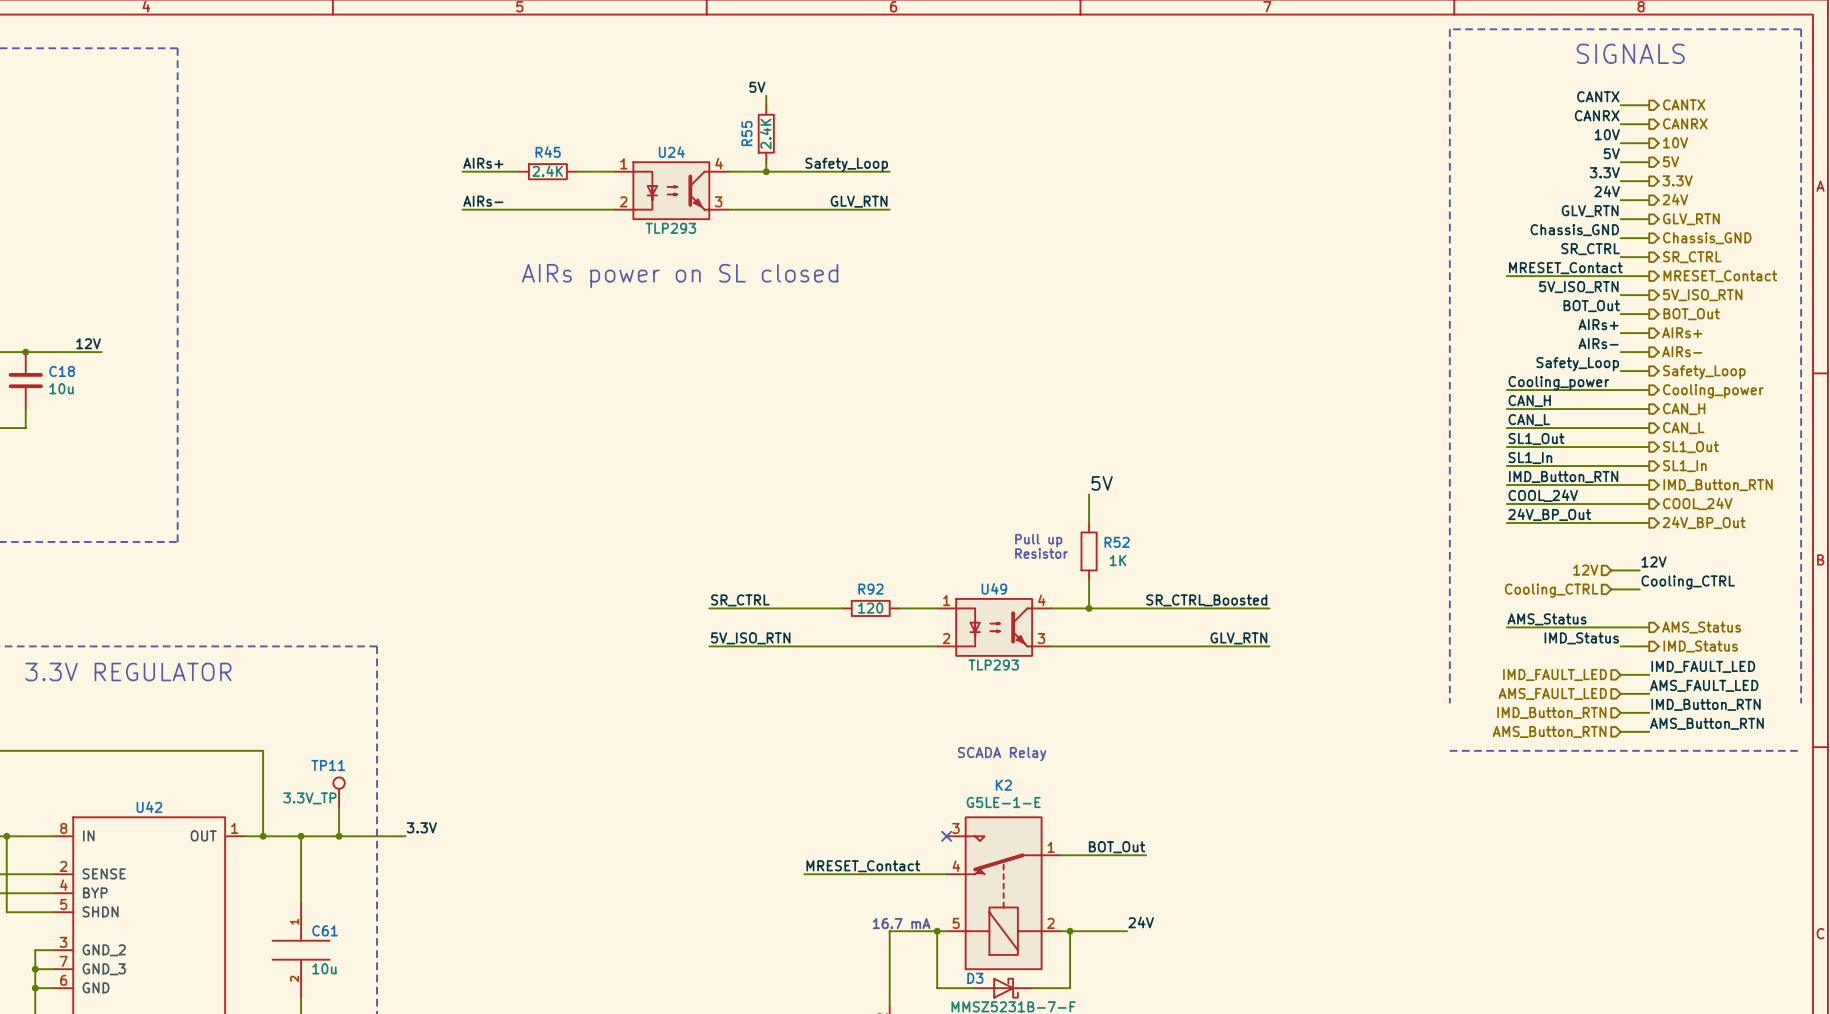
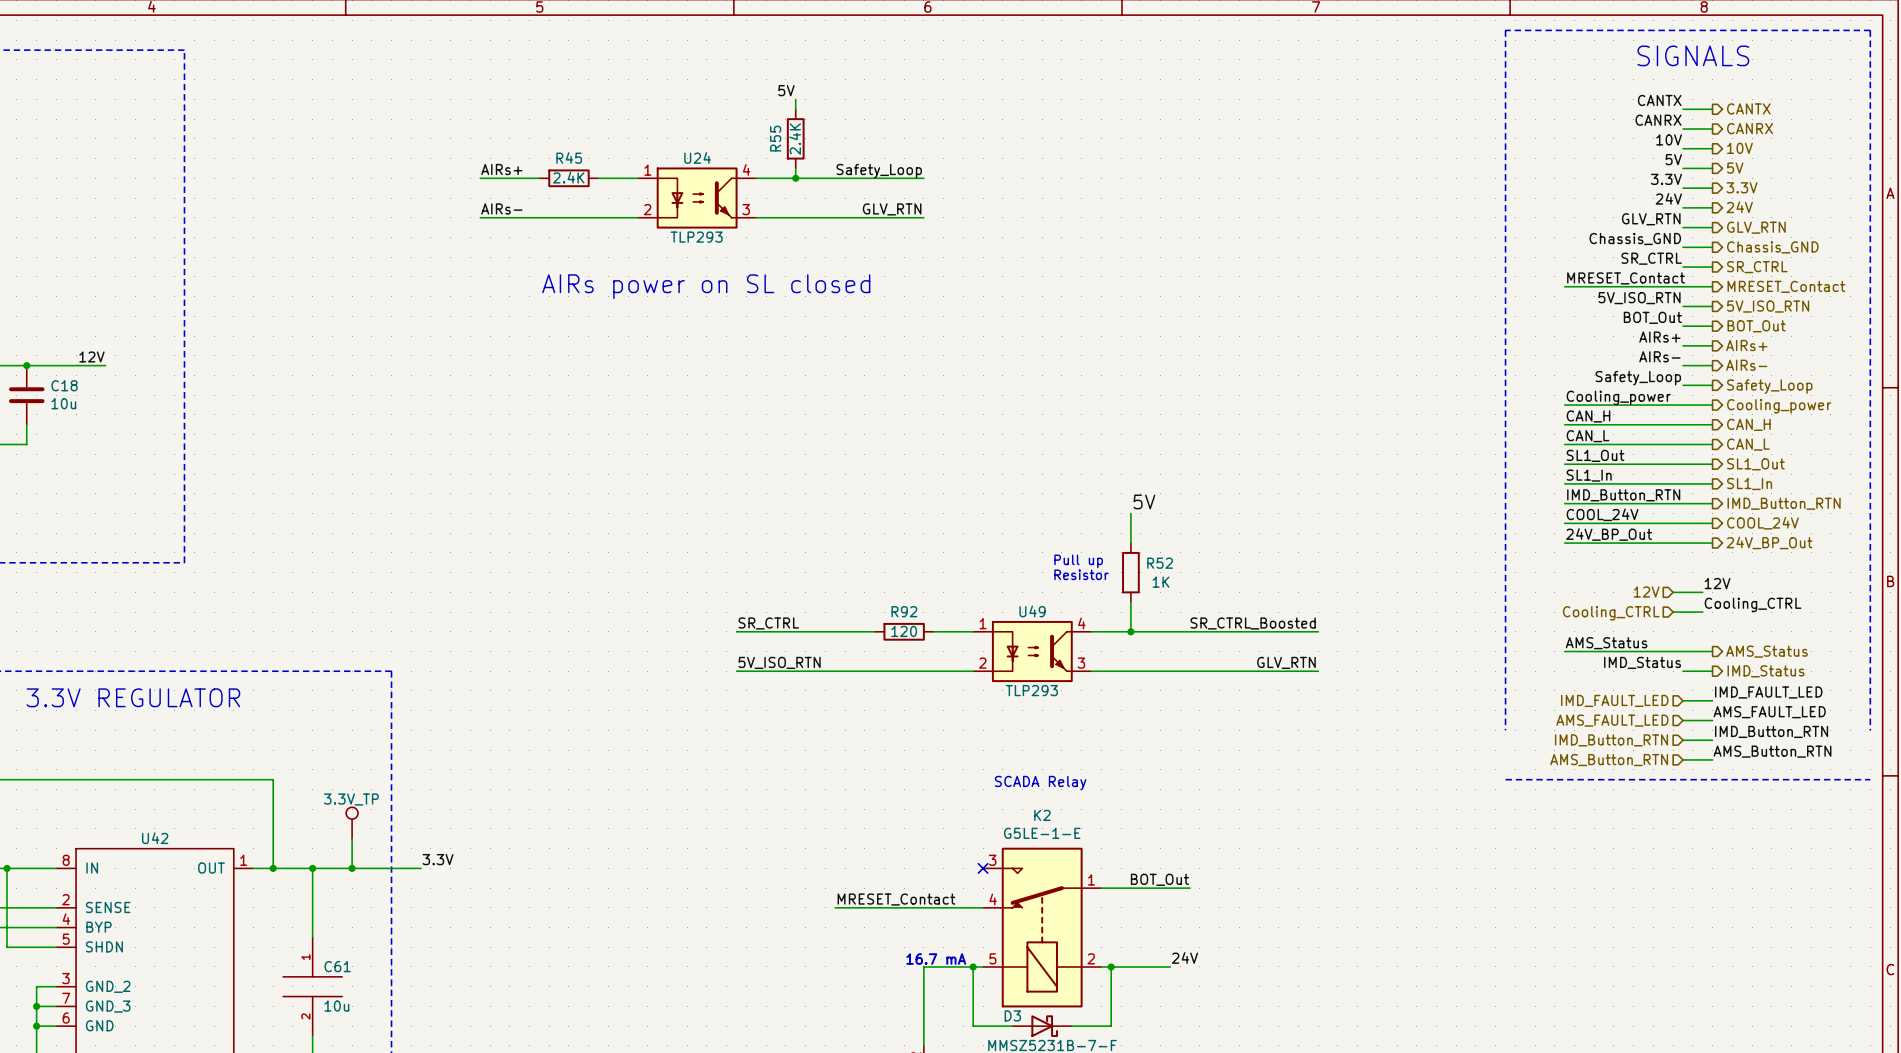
TP11 name: TP11 (328, 765) -> none
TP11 value position: 3.3V_TP (309, 798) -> 3.3V_TP (351, 799)

